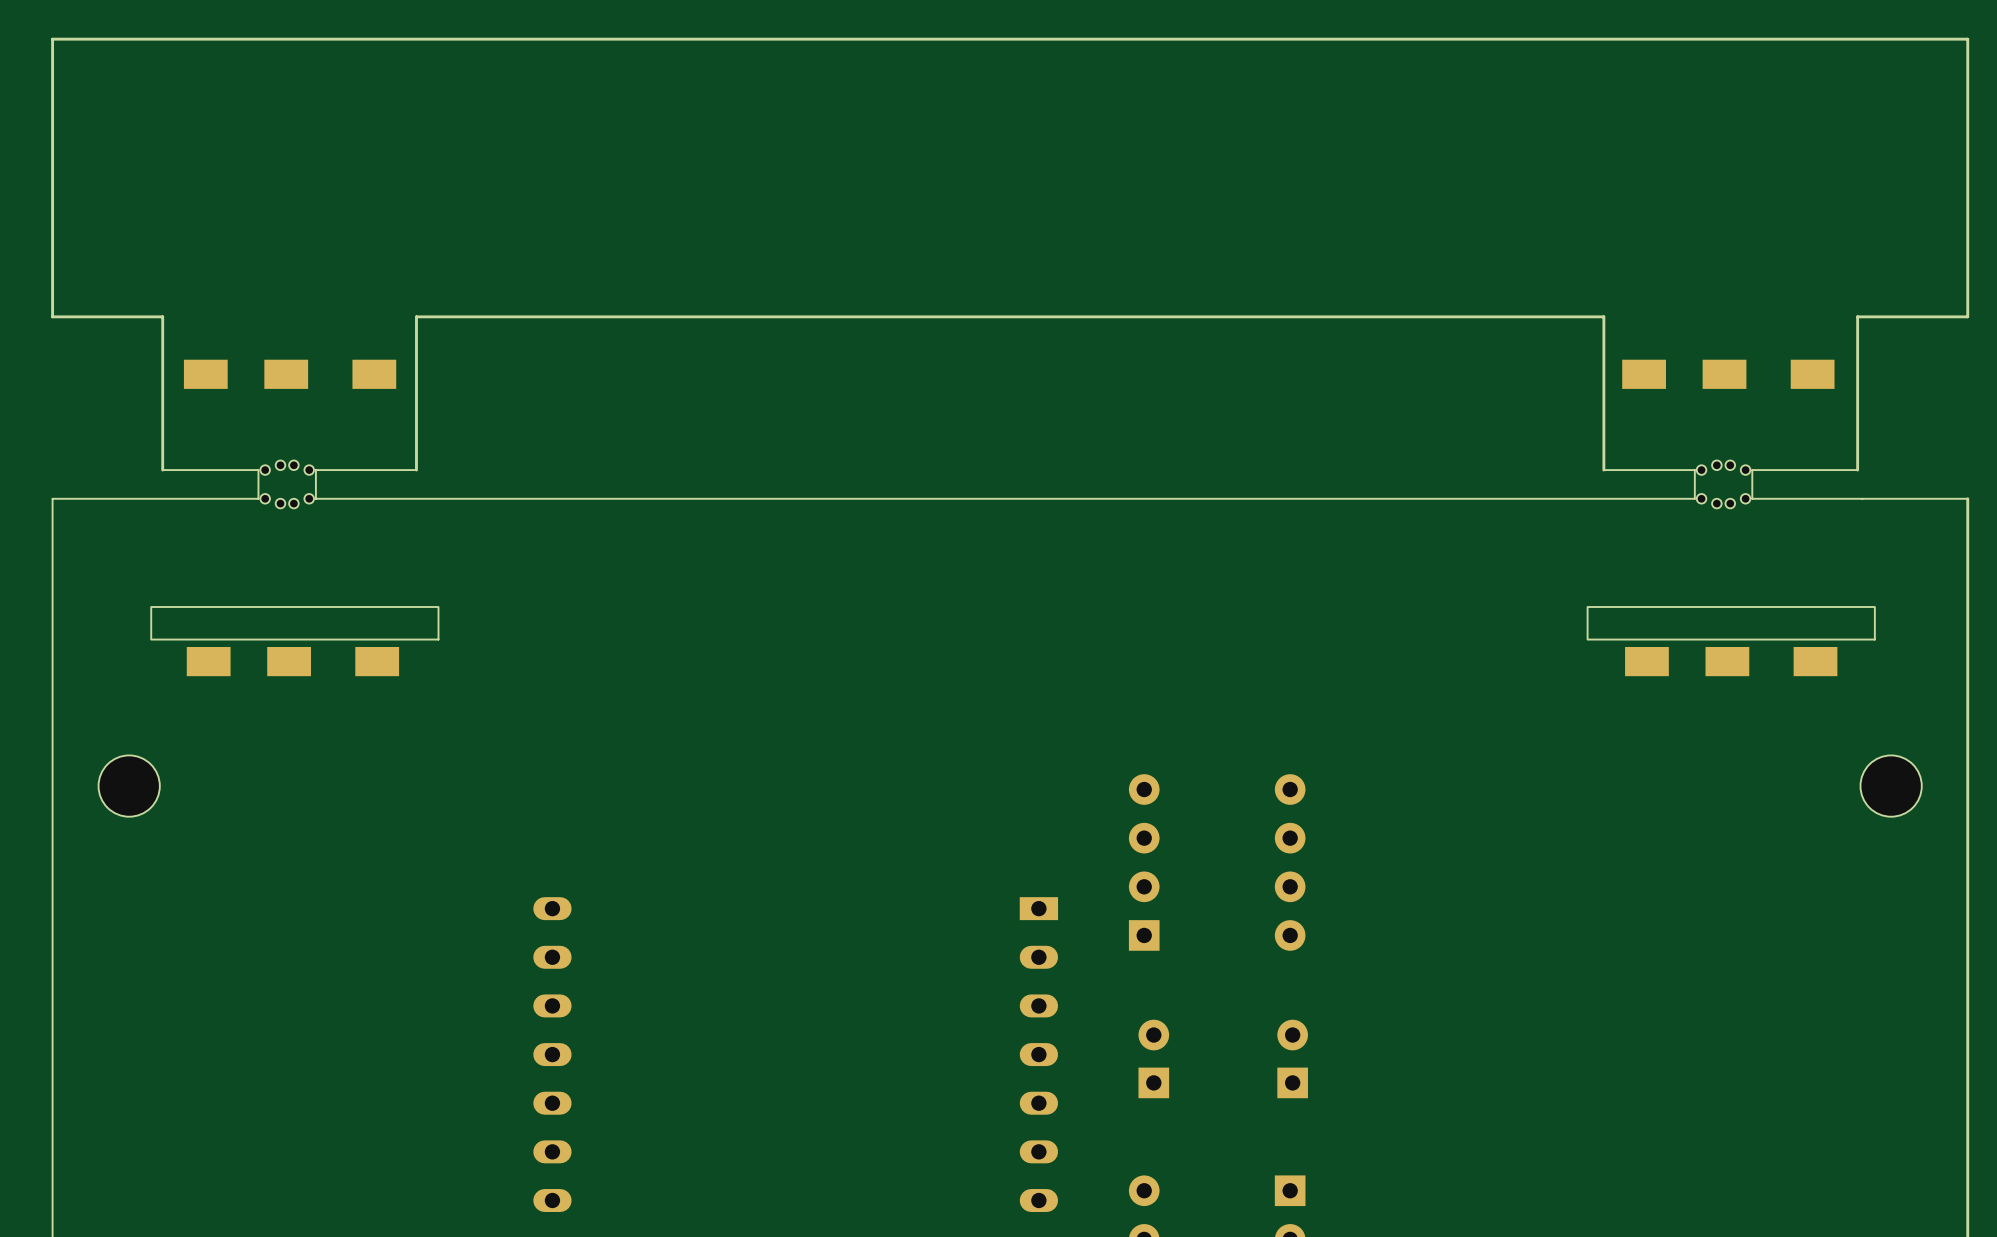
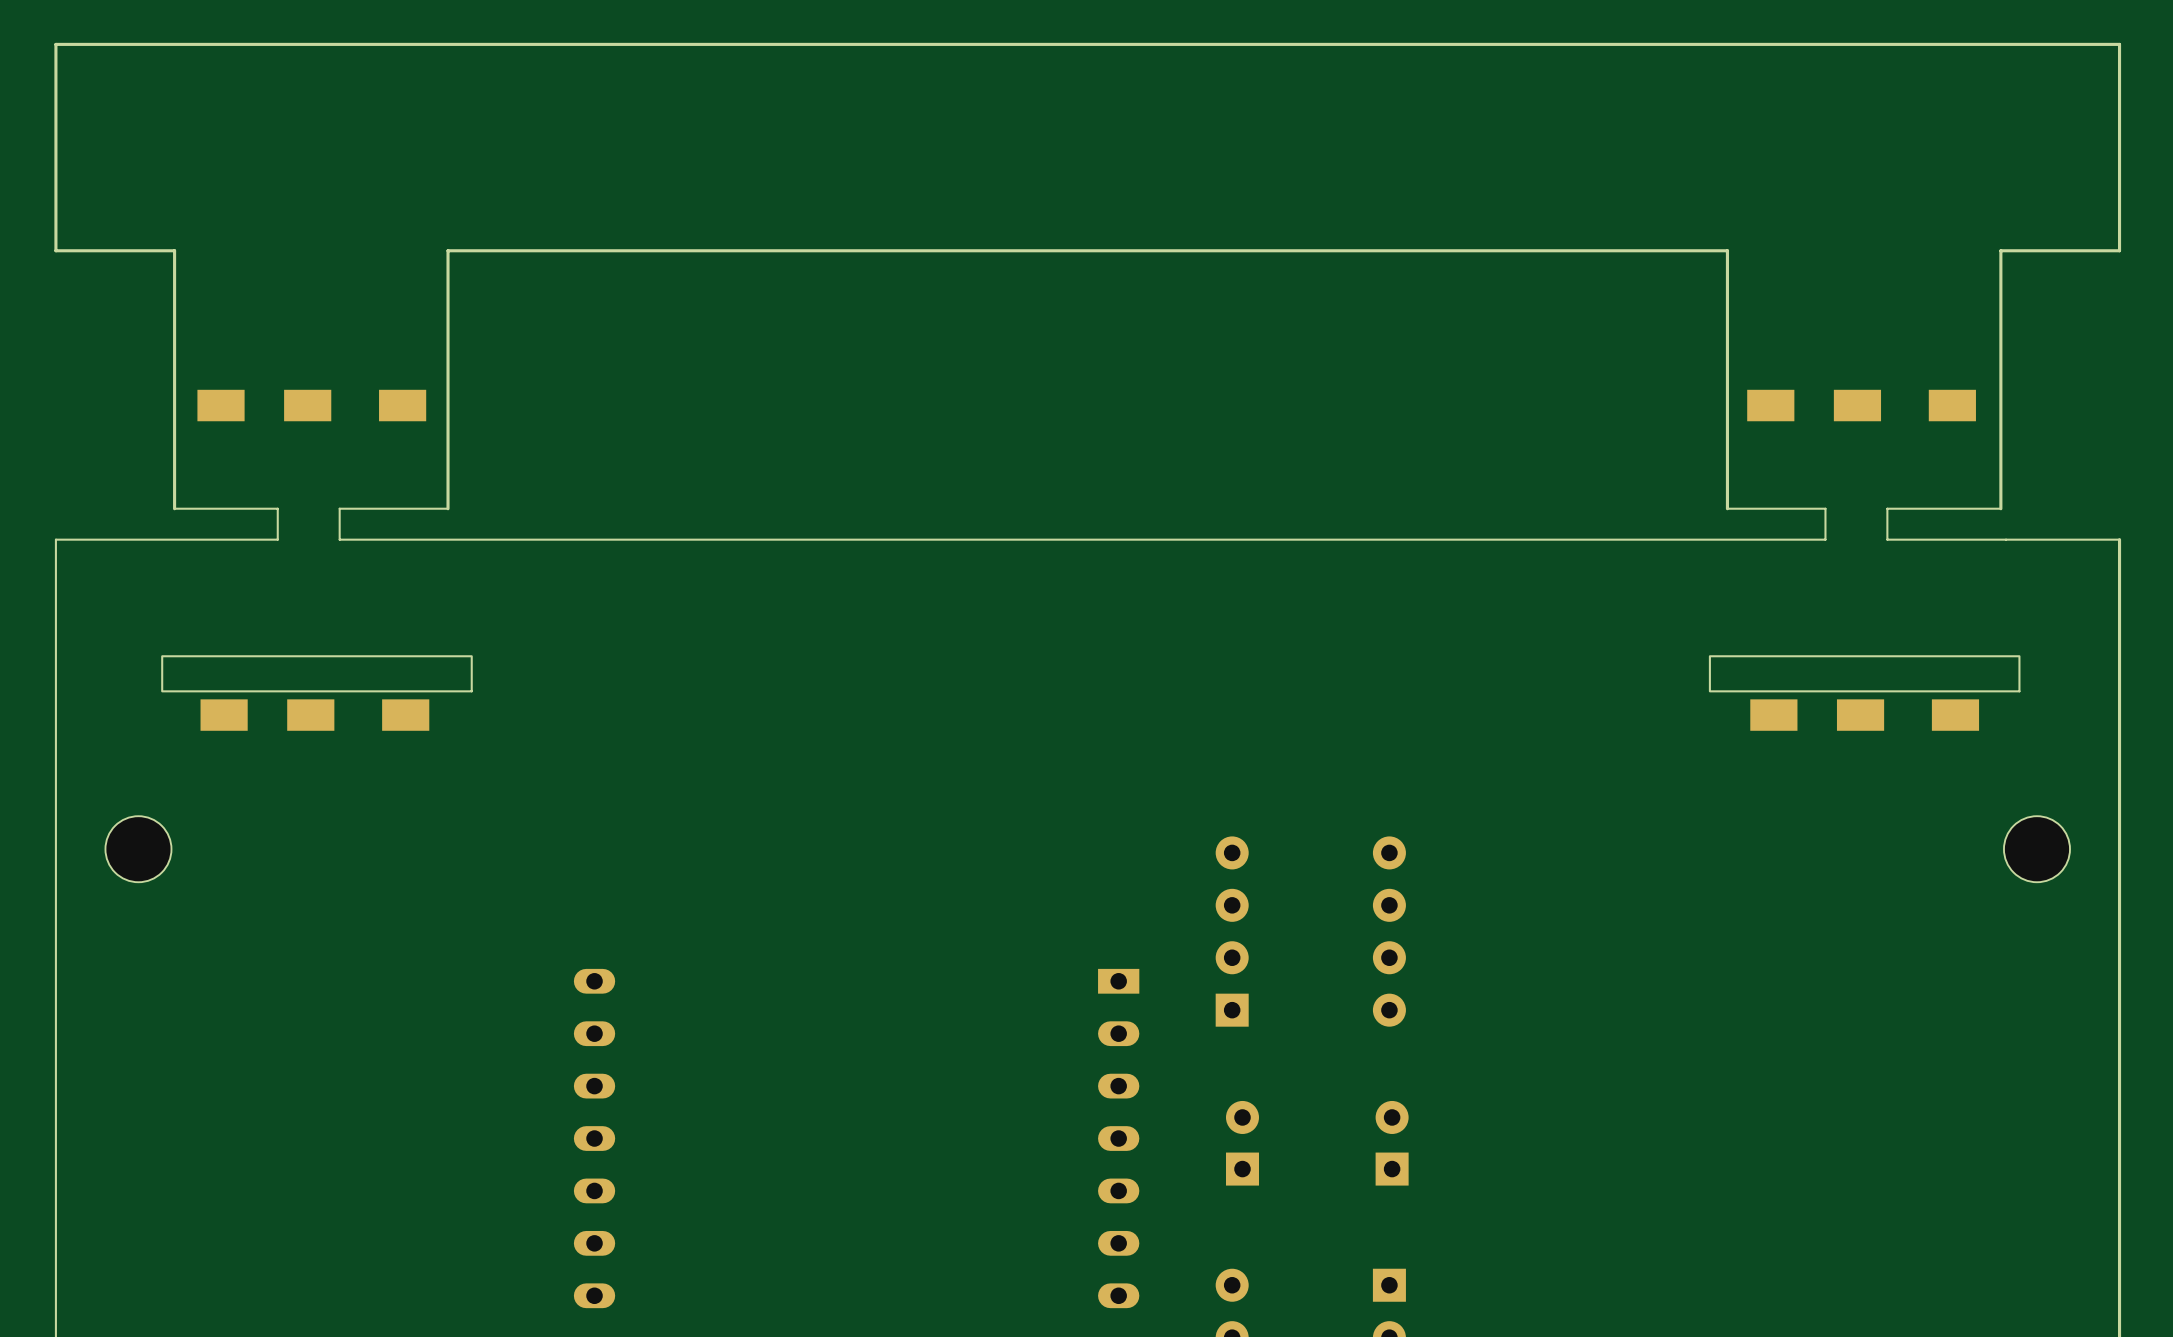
board edge: (52, 230) (52, 316) (162, 316) -> (55, 250) (174, 250) (174, 343)
board edge: (1967, 230) (1967, 316) (1857, 316) -> (2119, 250) (2000, 250) (2000, 343)
board edge: (1603, 316) (416, 316) -> (1727, 343) (1727, 250) (448, 250) (448, 343)
part: (287, 484) -> none
part: (1723, 484) -> none

